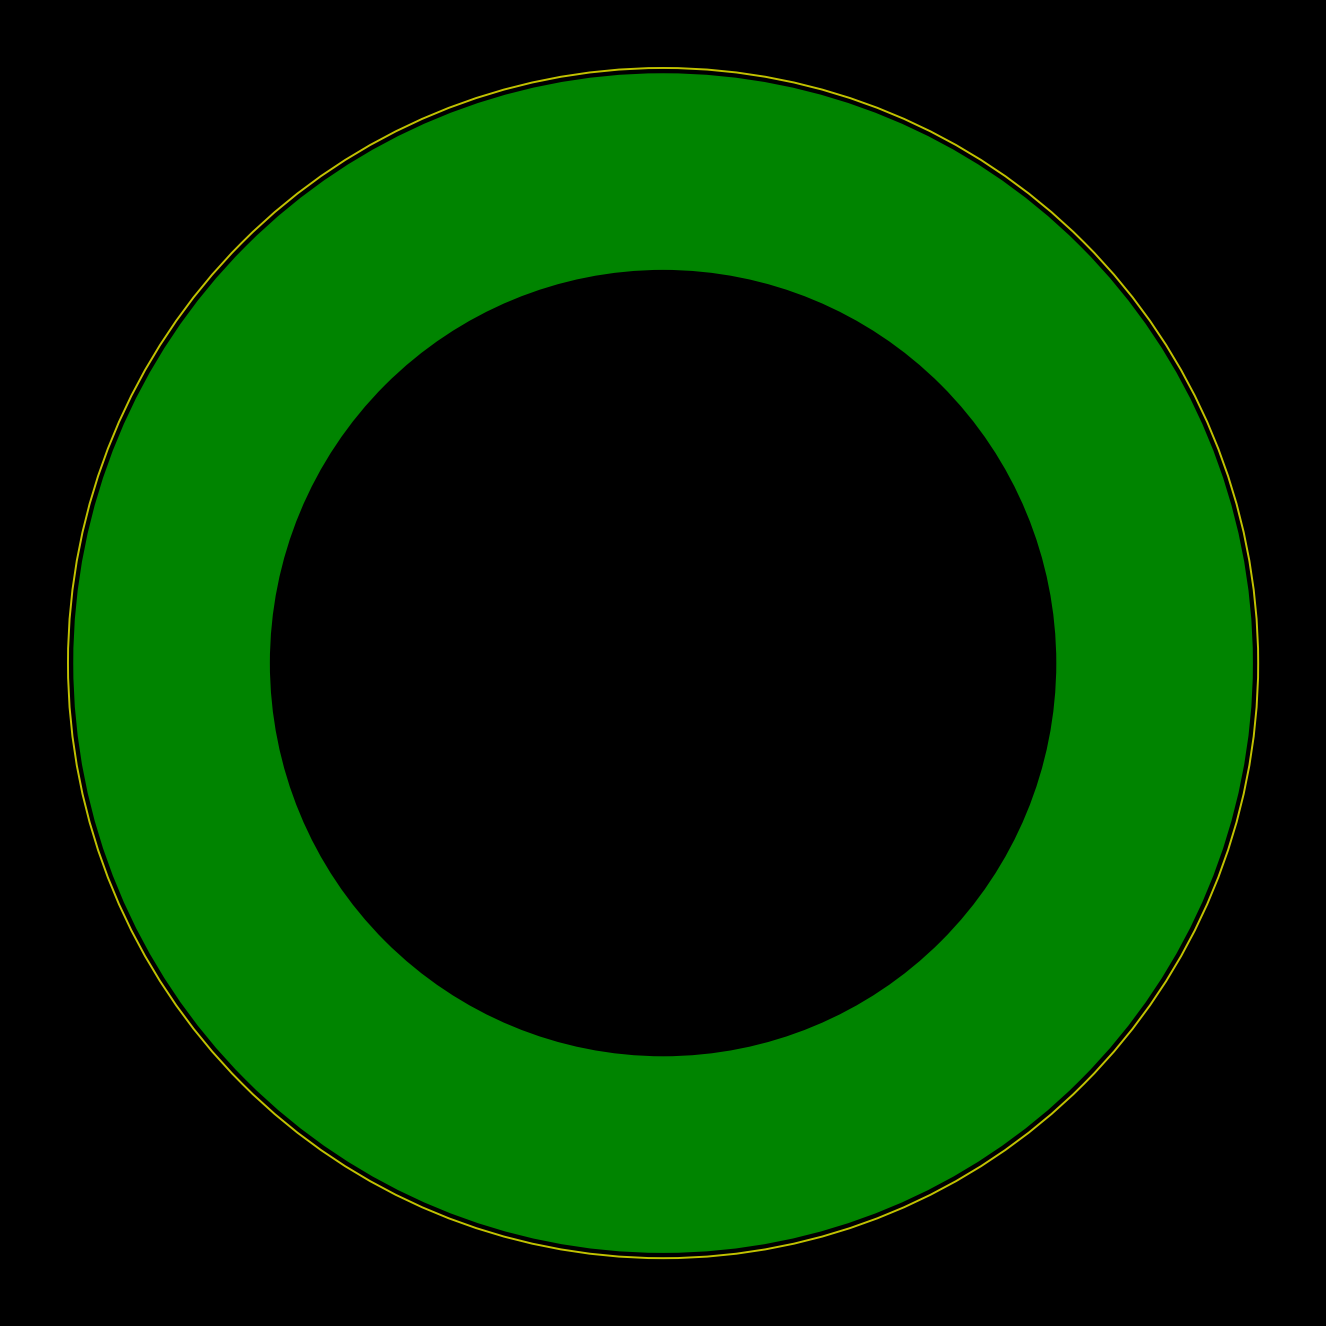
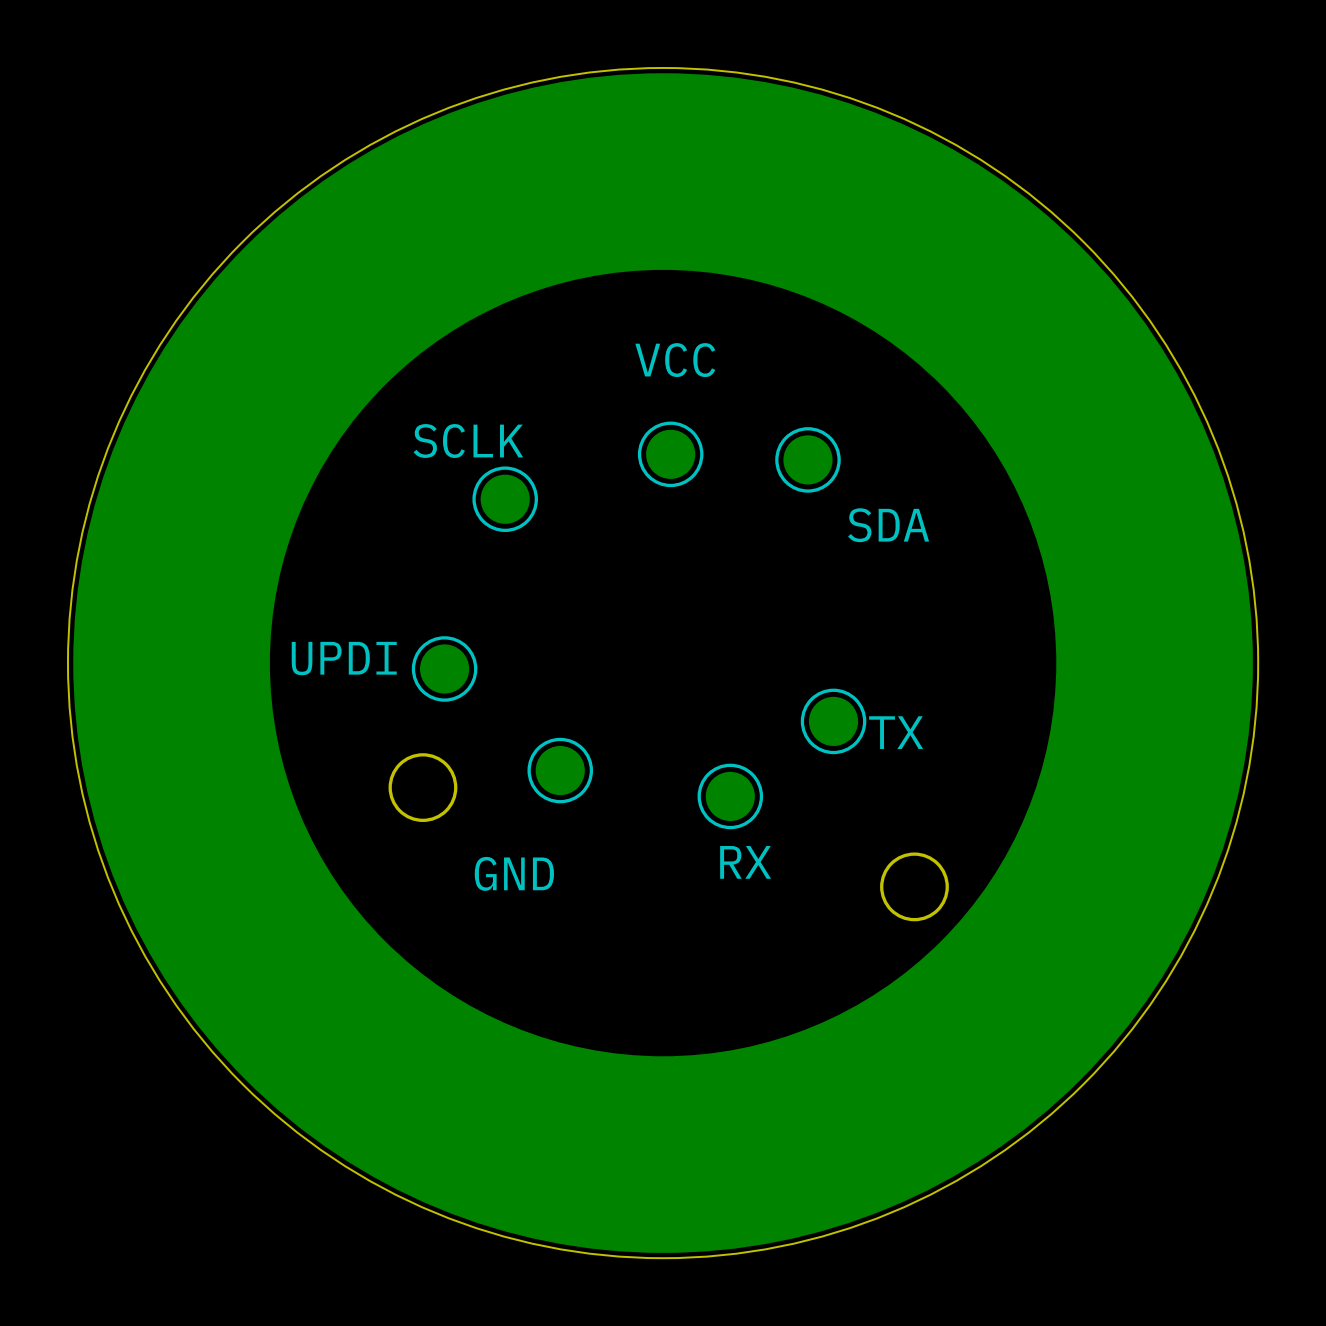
VCC: none -> (670, 454)
SDA: none -> (807, 459)
SCLK: none -> (505, 499)
UPDI: none -> (444, 668)
TX: none -> (833, 721)
round board edge: none -> [388, 753, 458, 823]
GND: none -> (560, 770)
RX: none -> (730, 796)
round board edge: none -> [880, 852, 949, 922]

